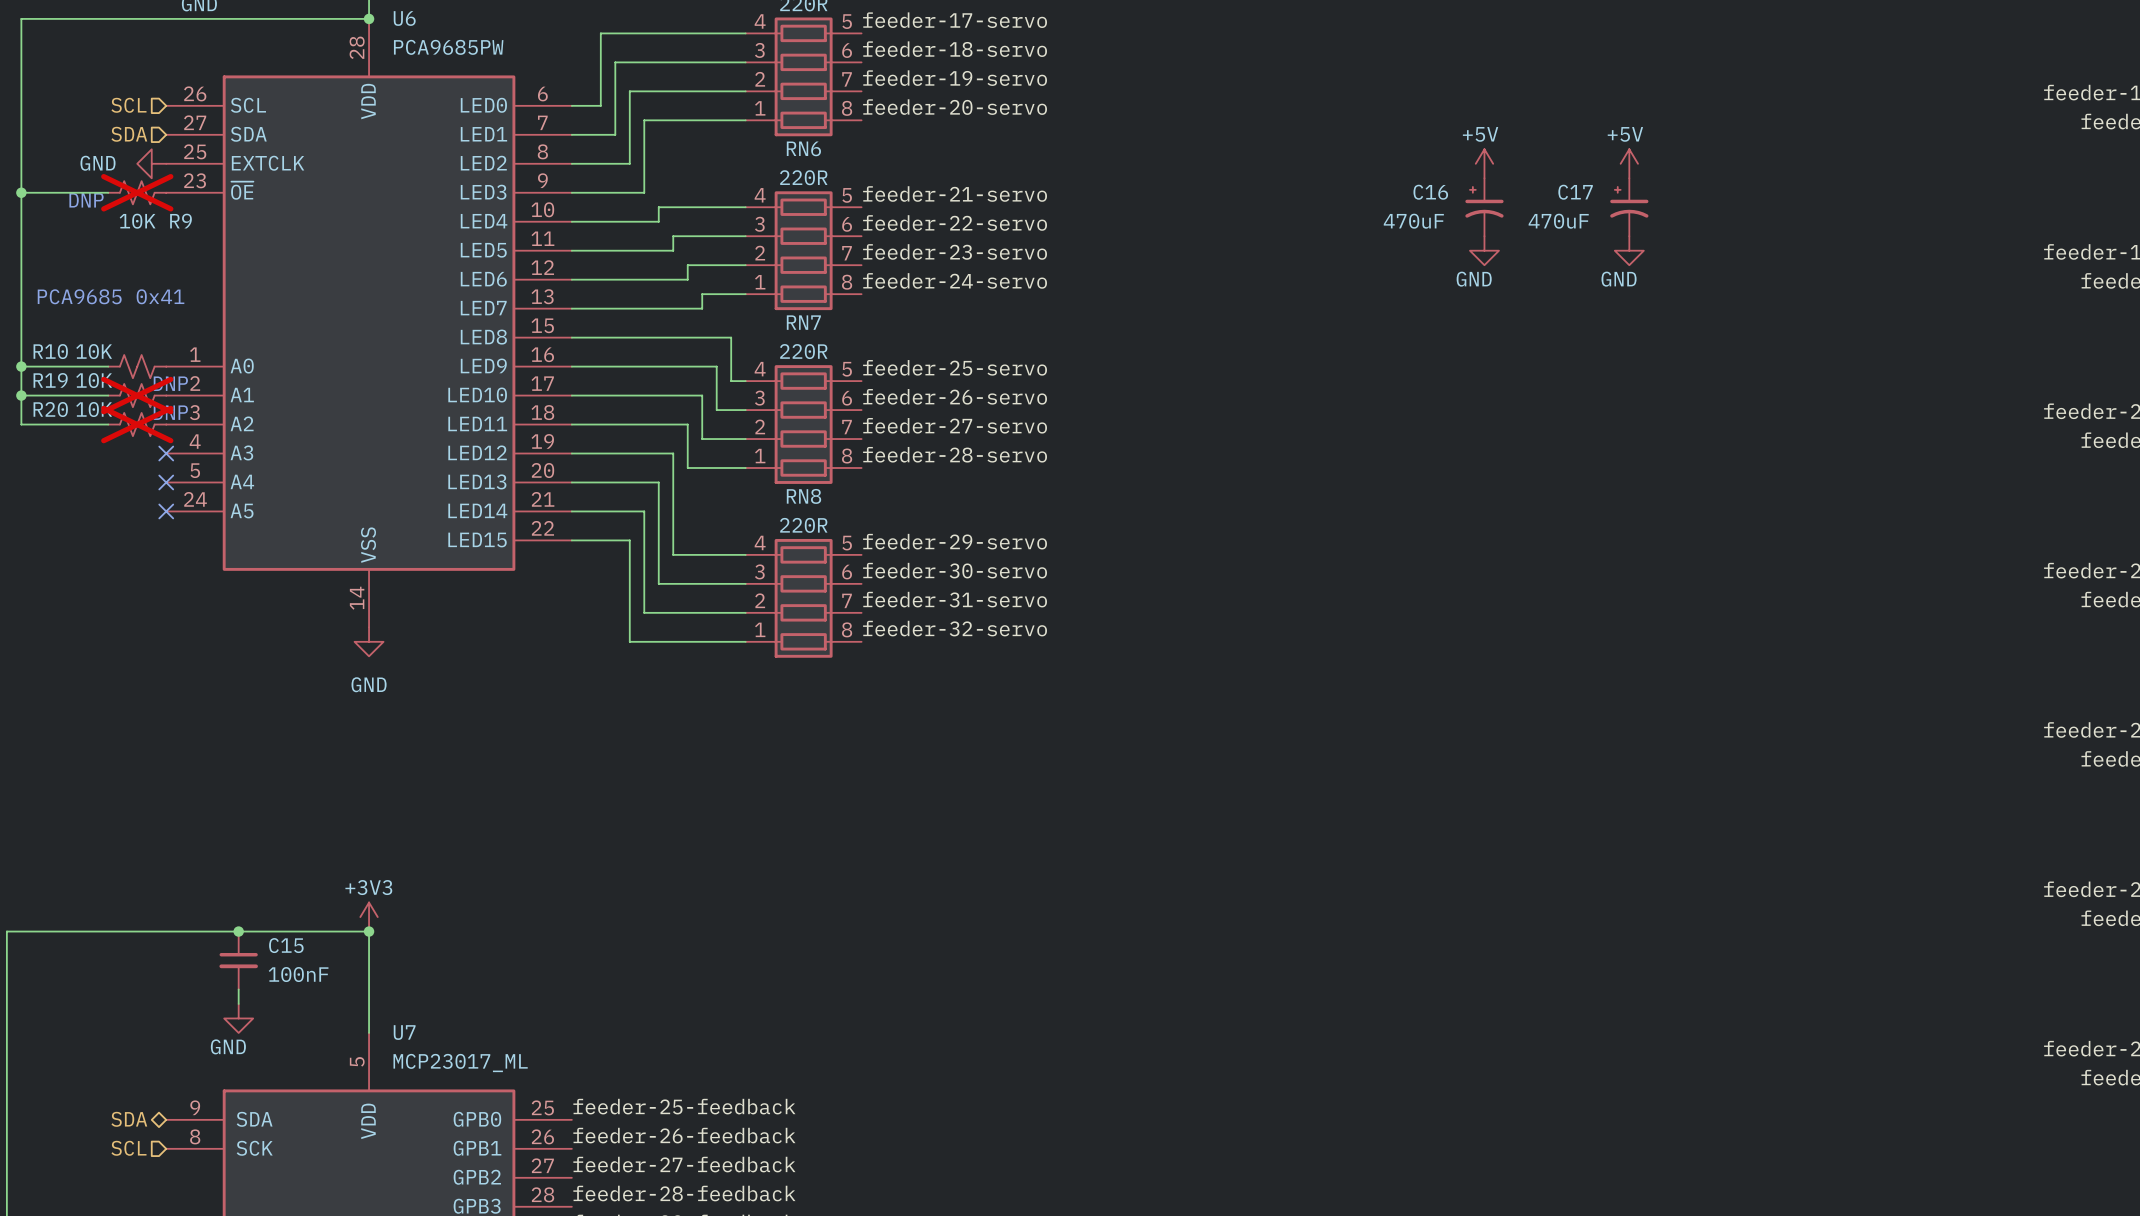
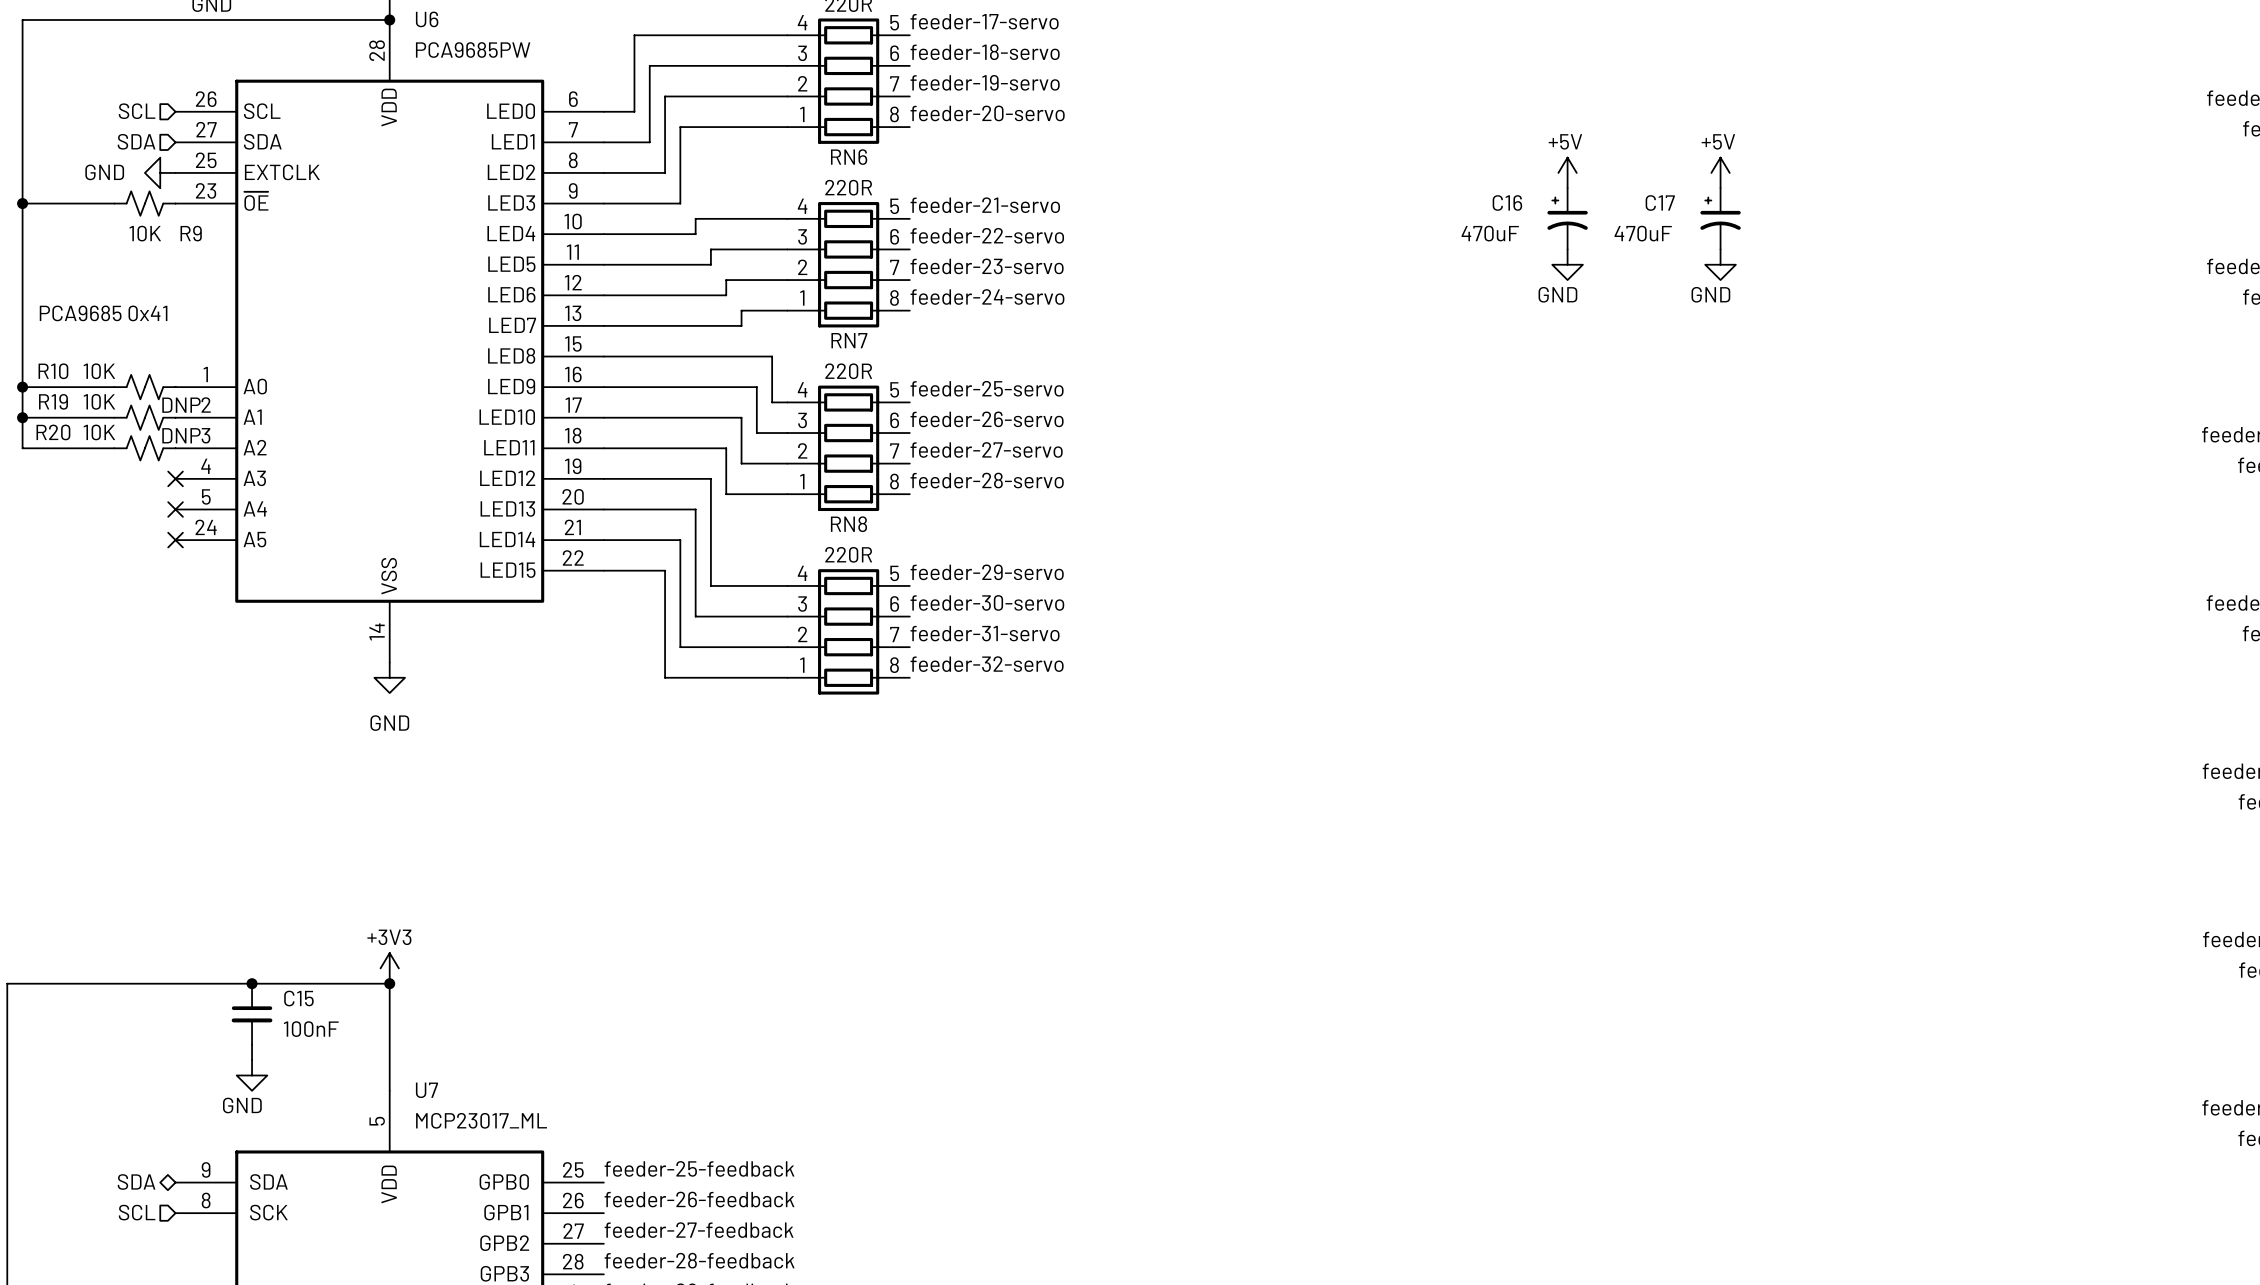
R9 do-not-place cross: (137, 192) -> none
text: DNP (86, 200) -> none
R19 do-not-place cross: (137, 395) -> none
R20 do-not-place cross: (137, 424) -> none

